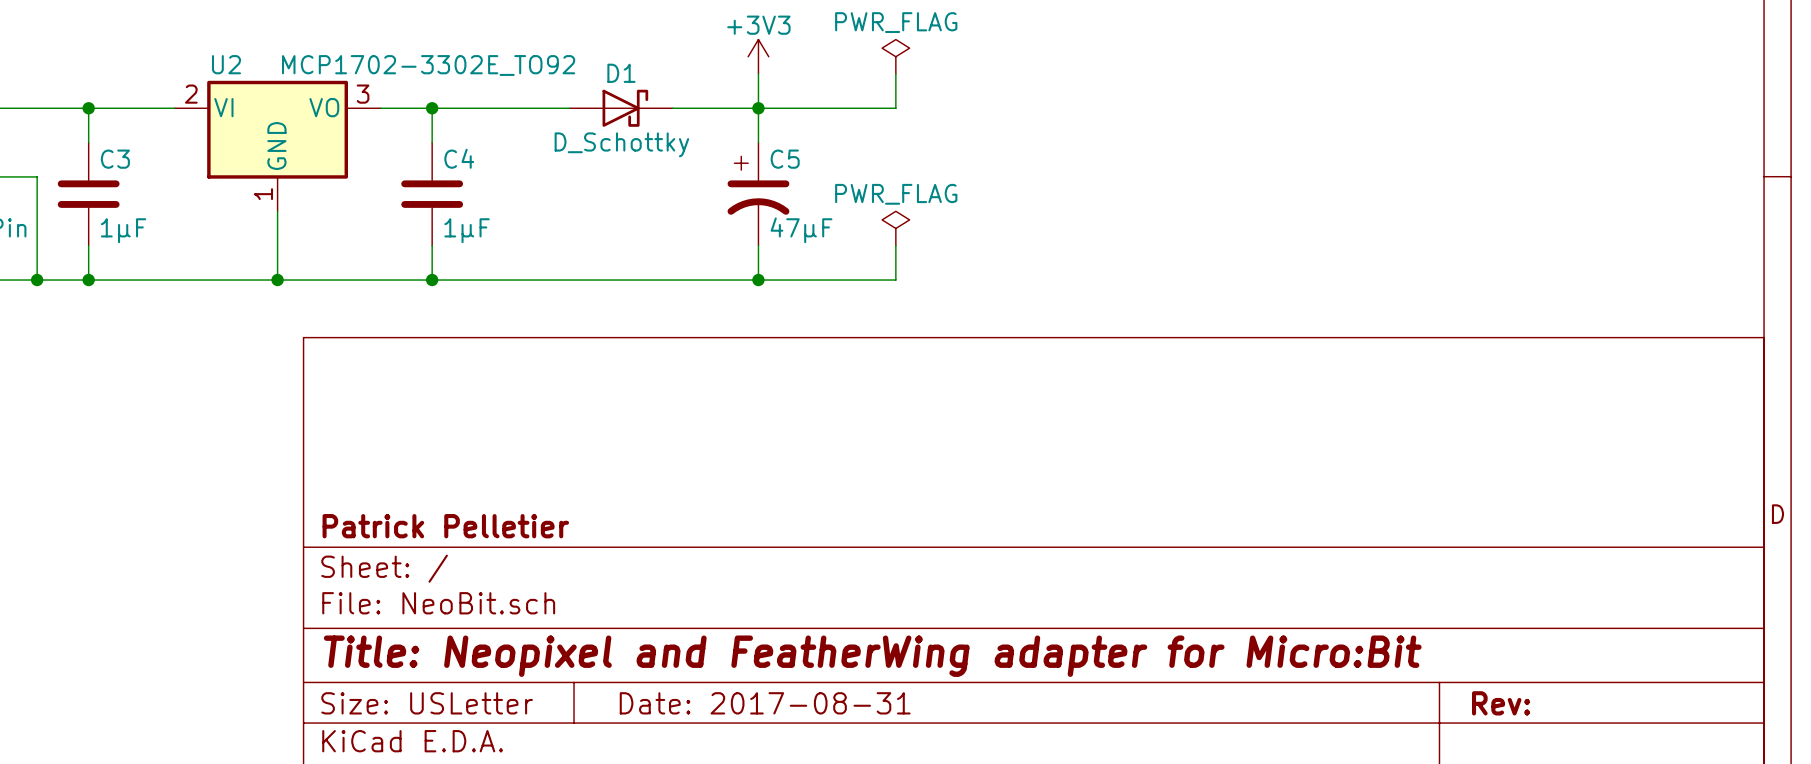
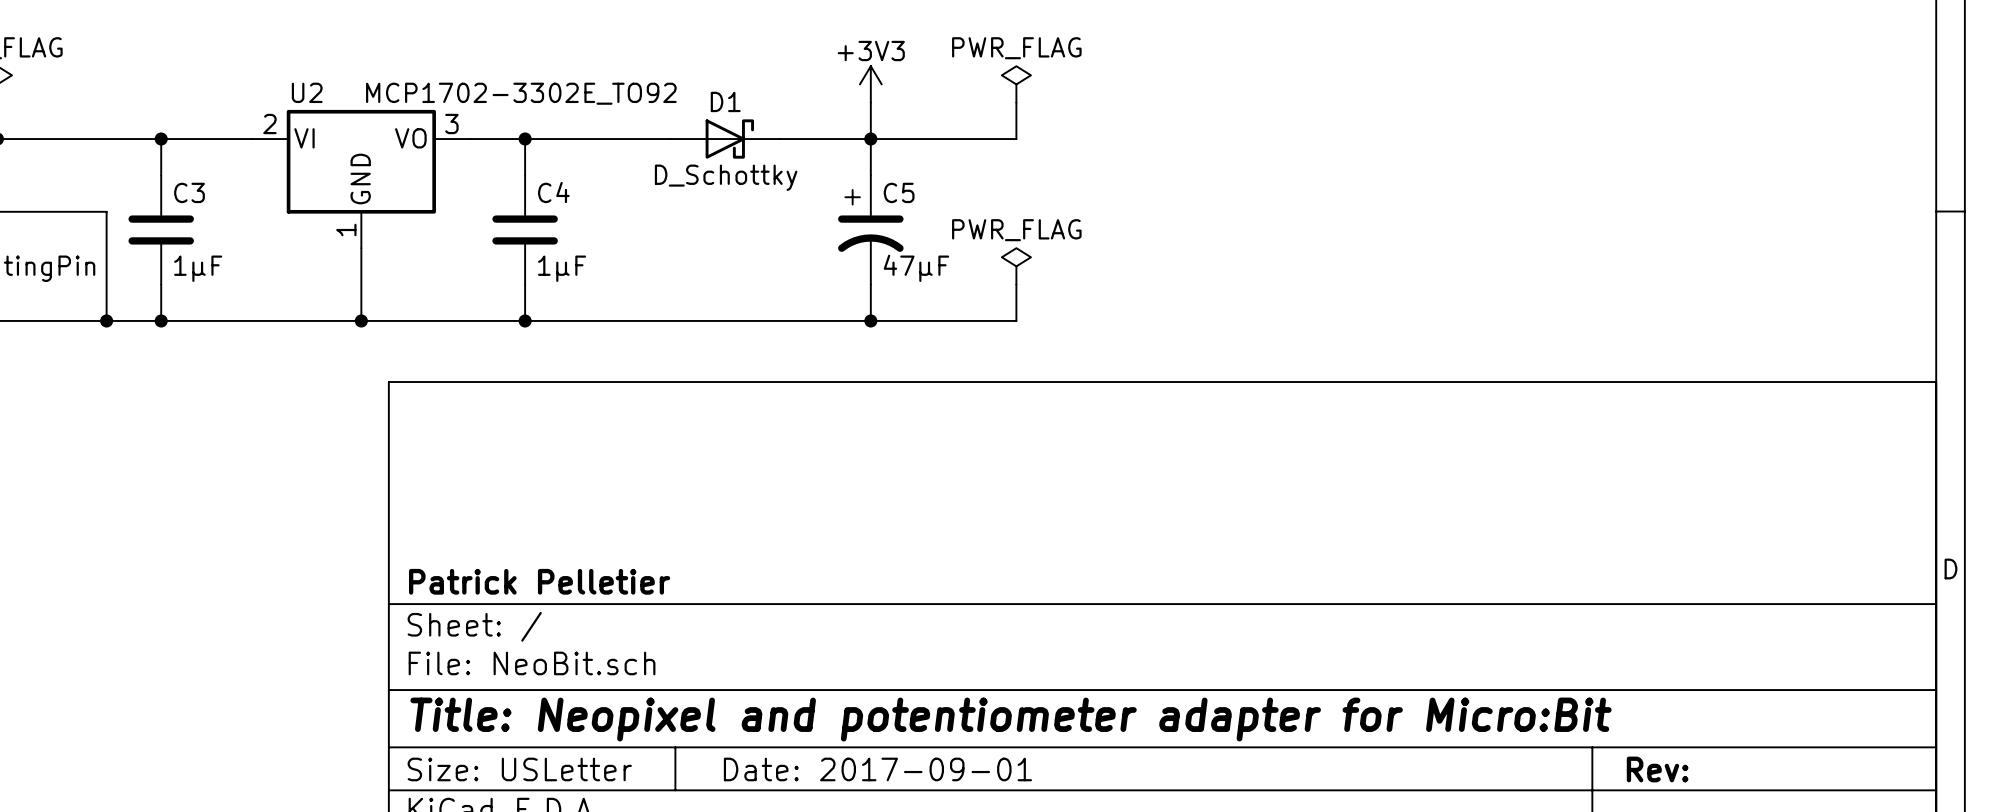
title block: Title: Neopixel and FeatherWing adapter for Micro:Bit (872, 656) -> Title: Neopixel and potentiometer adapter for Micro:Bit (1011, 719)
title block: Date: 2017-08-31 (765, 703) -> Date: 2017-09-01 (877, 769)

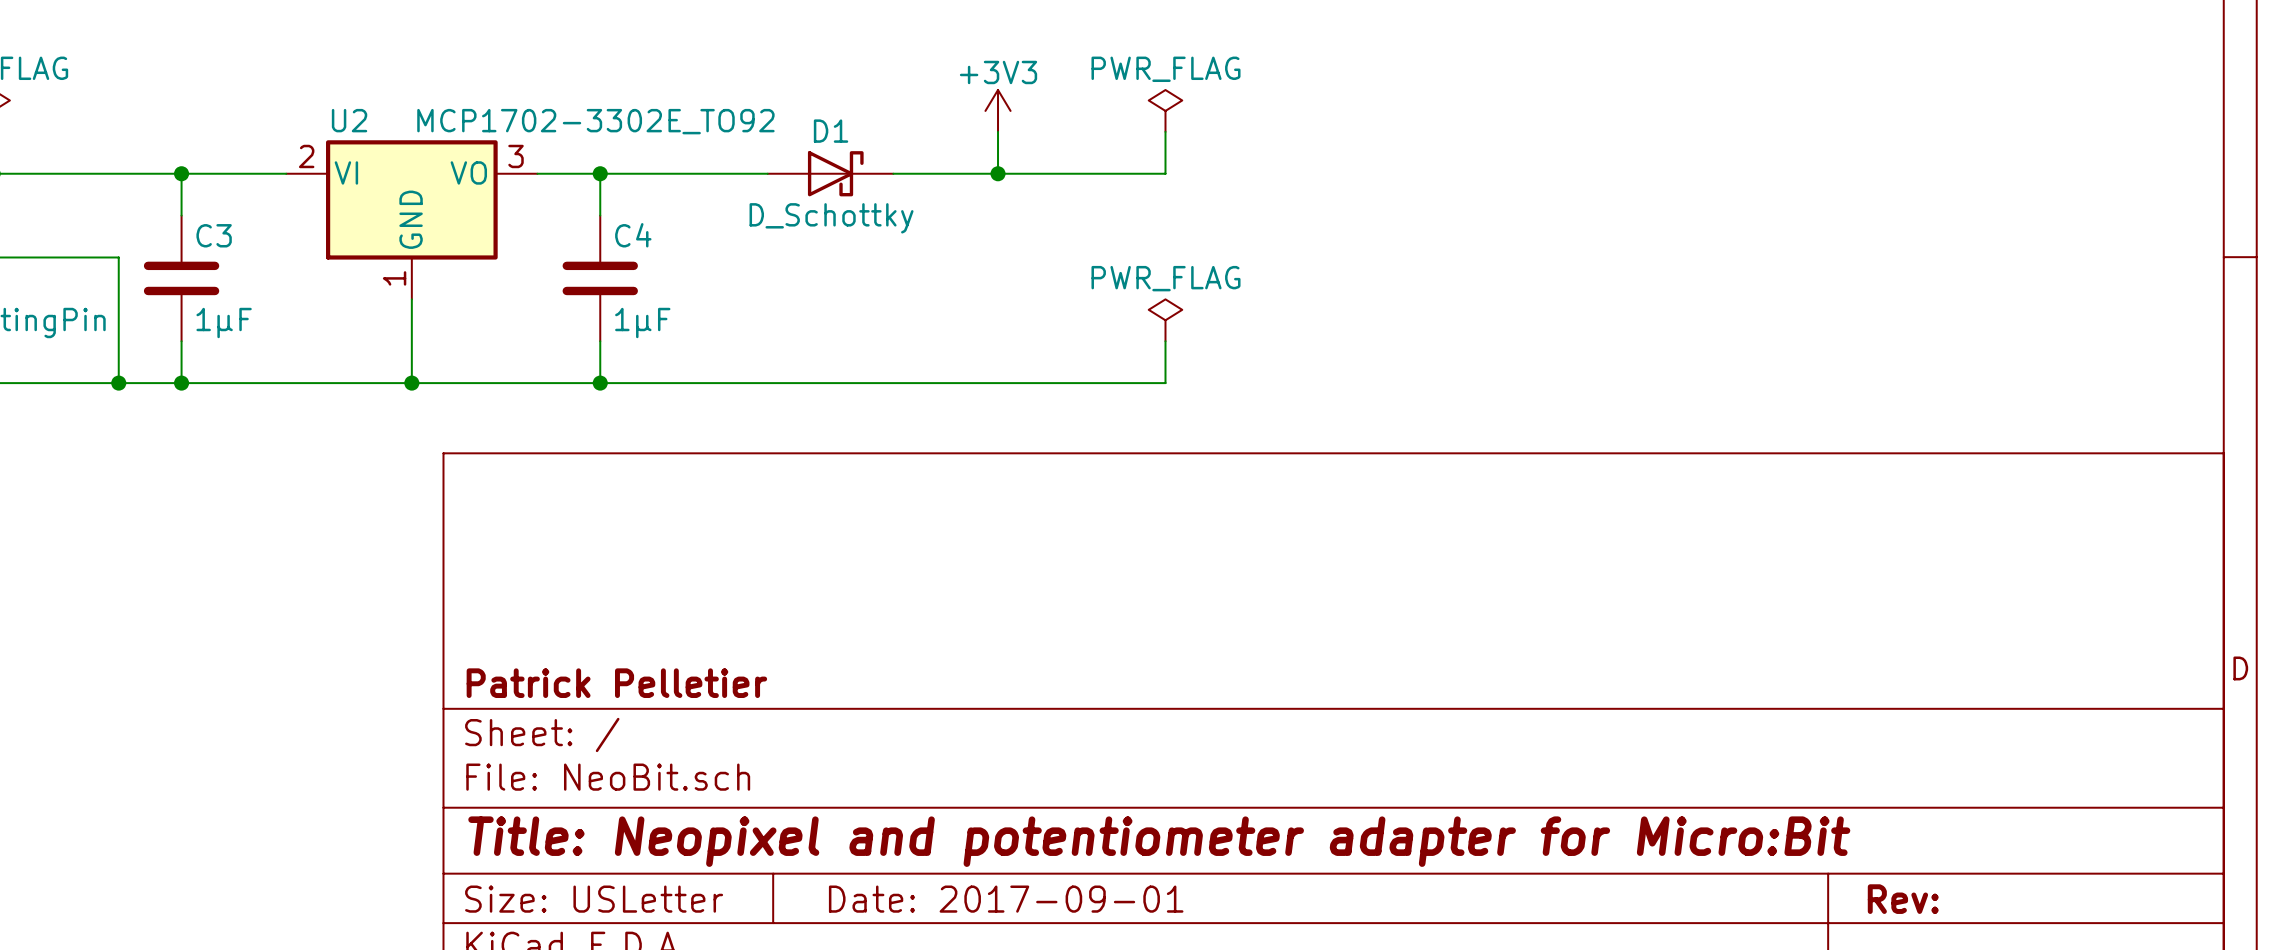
wire: (870, 139) (870, 175) -> none
C5: 47µF (870, 230) -> none
wire: (870, 284) (870, 320) -> none
junction: (870, 320) -> none

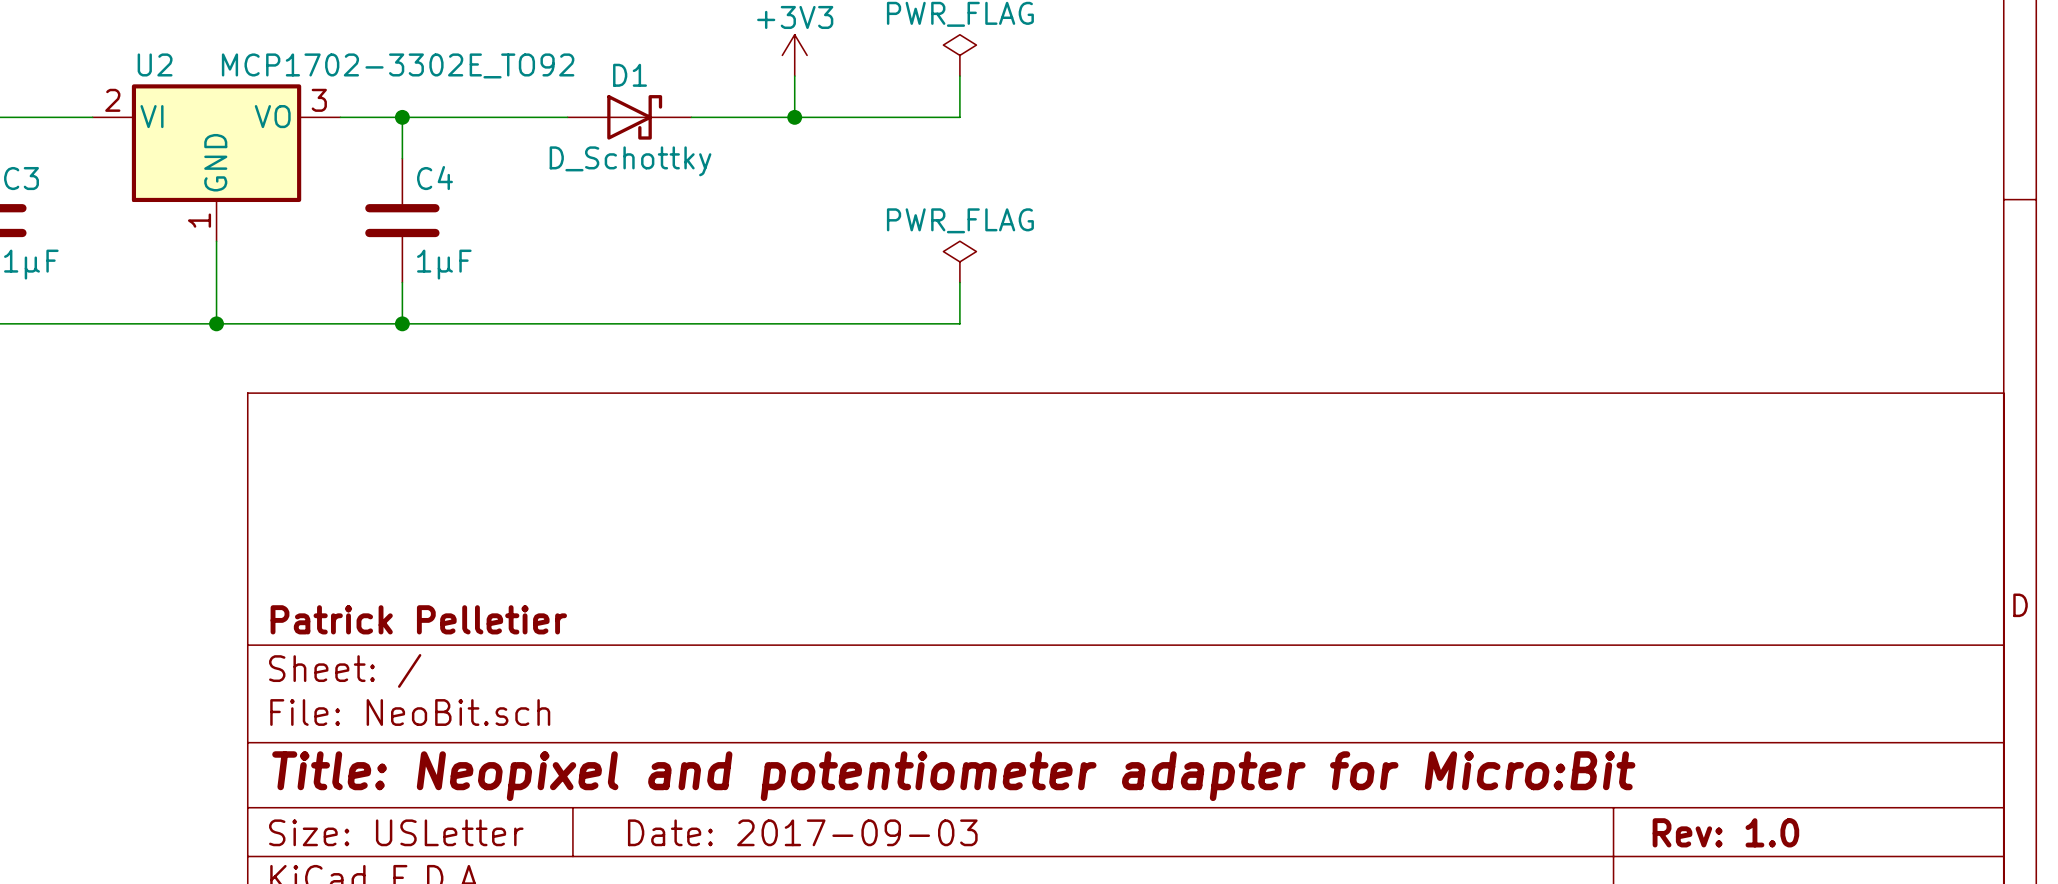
title block: Date: 2017-09-01 (1006, 899) -> Date: 2017-09-03 (802, 832)
title block: Rev: (1903, 899) -> Rev: 1.0 (1725, 832)

